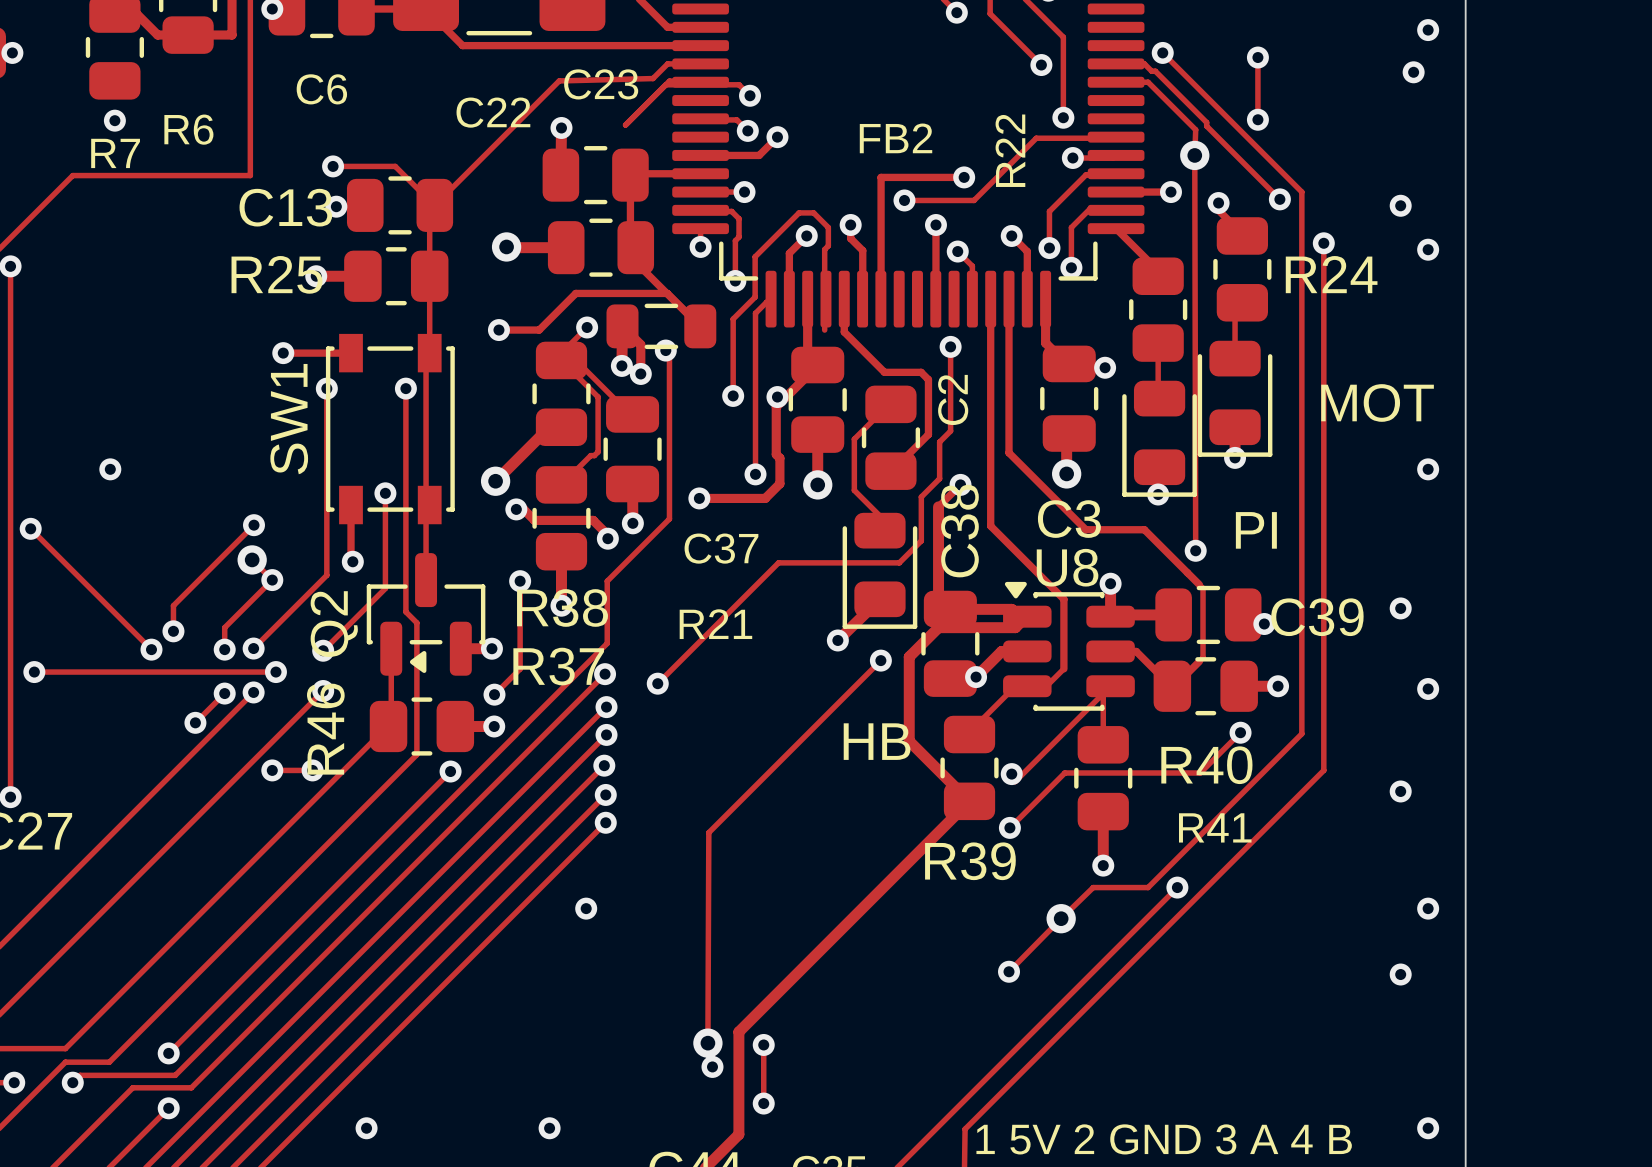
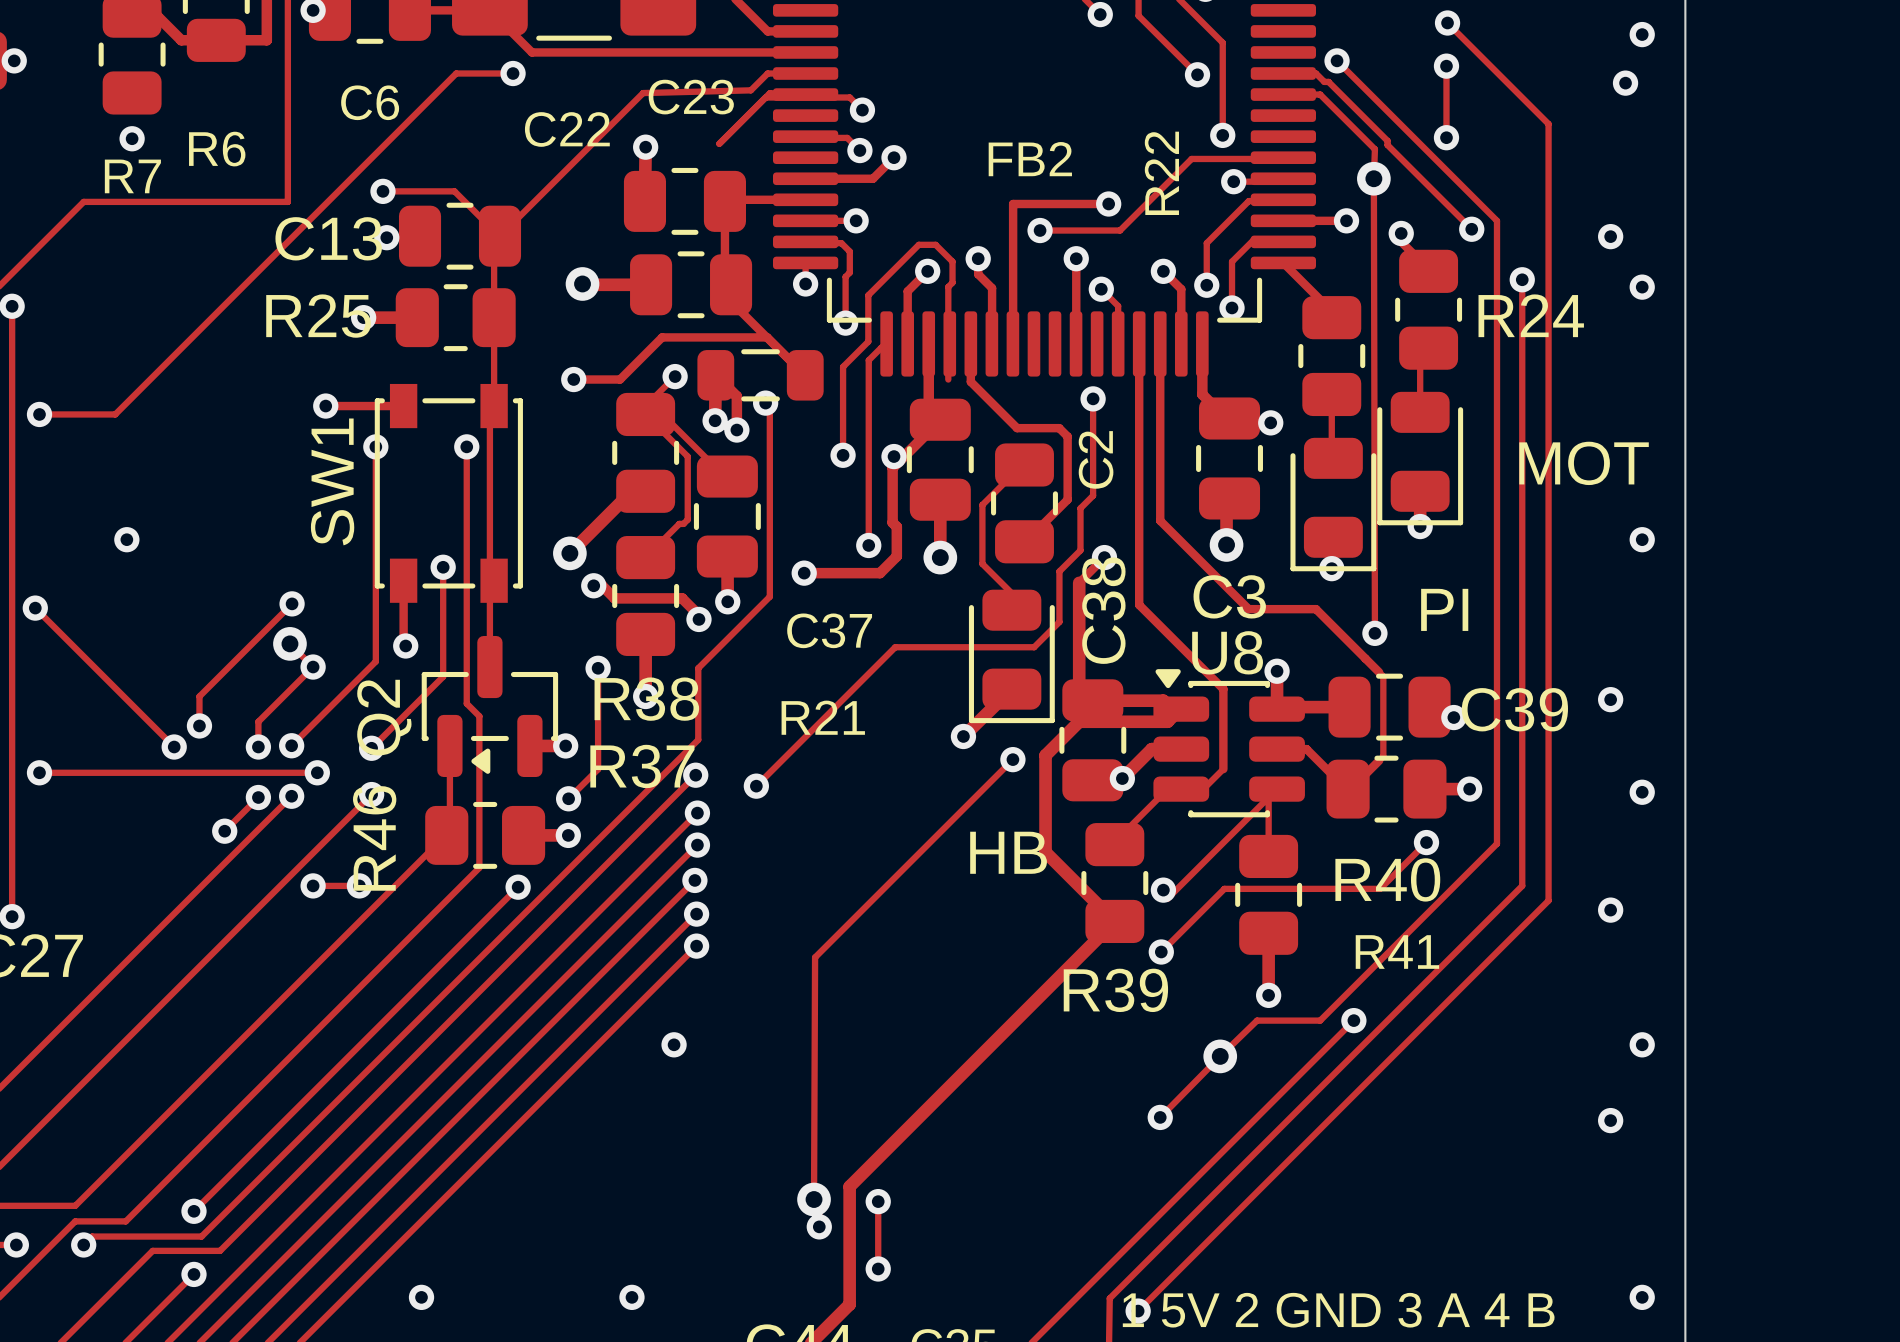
track: none -> (1447, 23) (1548, 124) (1548, 900) (1138, 1311)
via: none -> (1447, 23)
track: none -> (513, 73) (456, 73) (115, 414) (39, 414)
via: none -> (513, 73)
via: none -> (39, 414)
via: none -> (1138, 1311)

